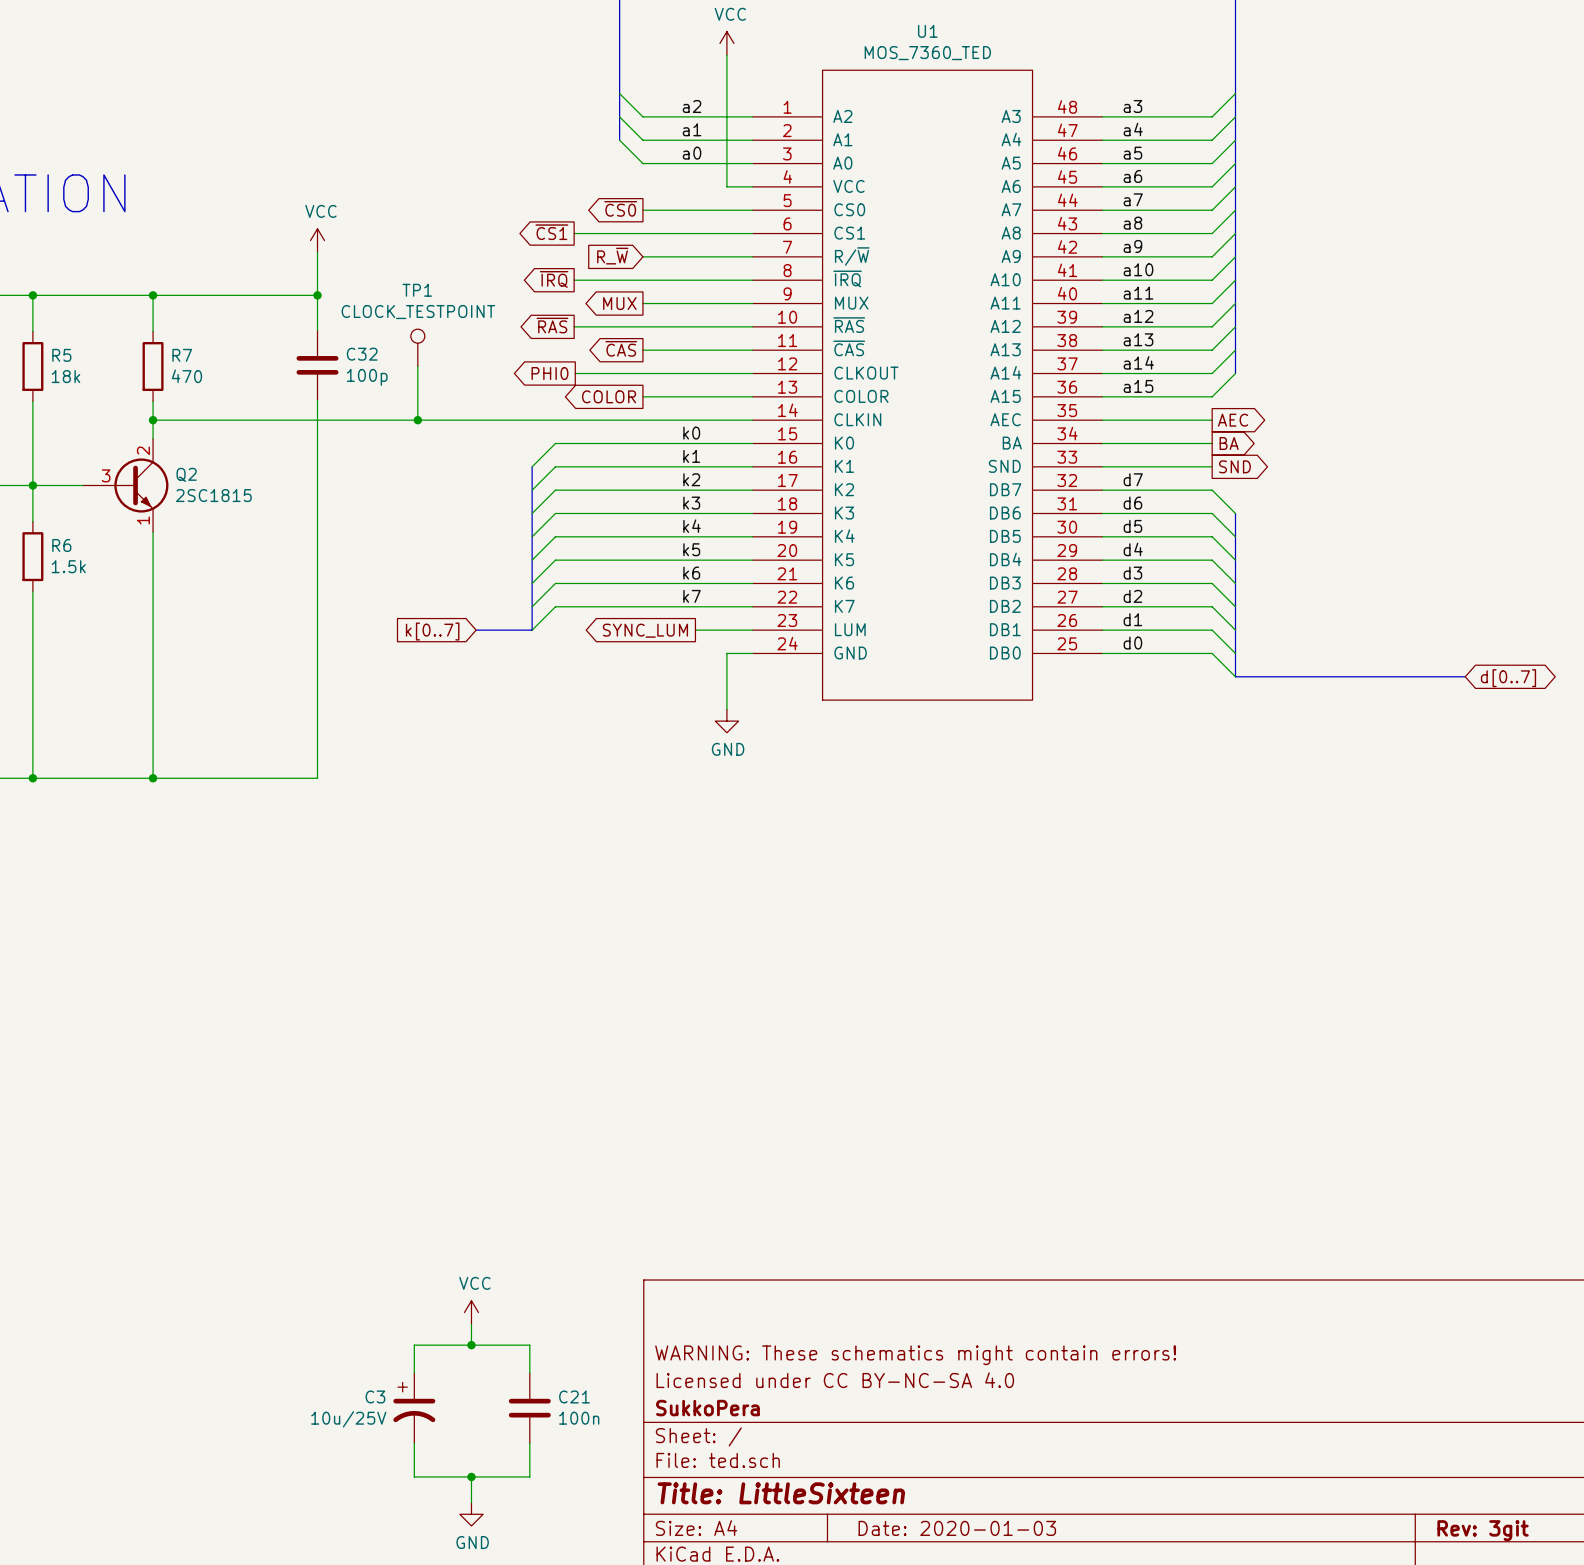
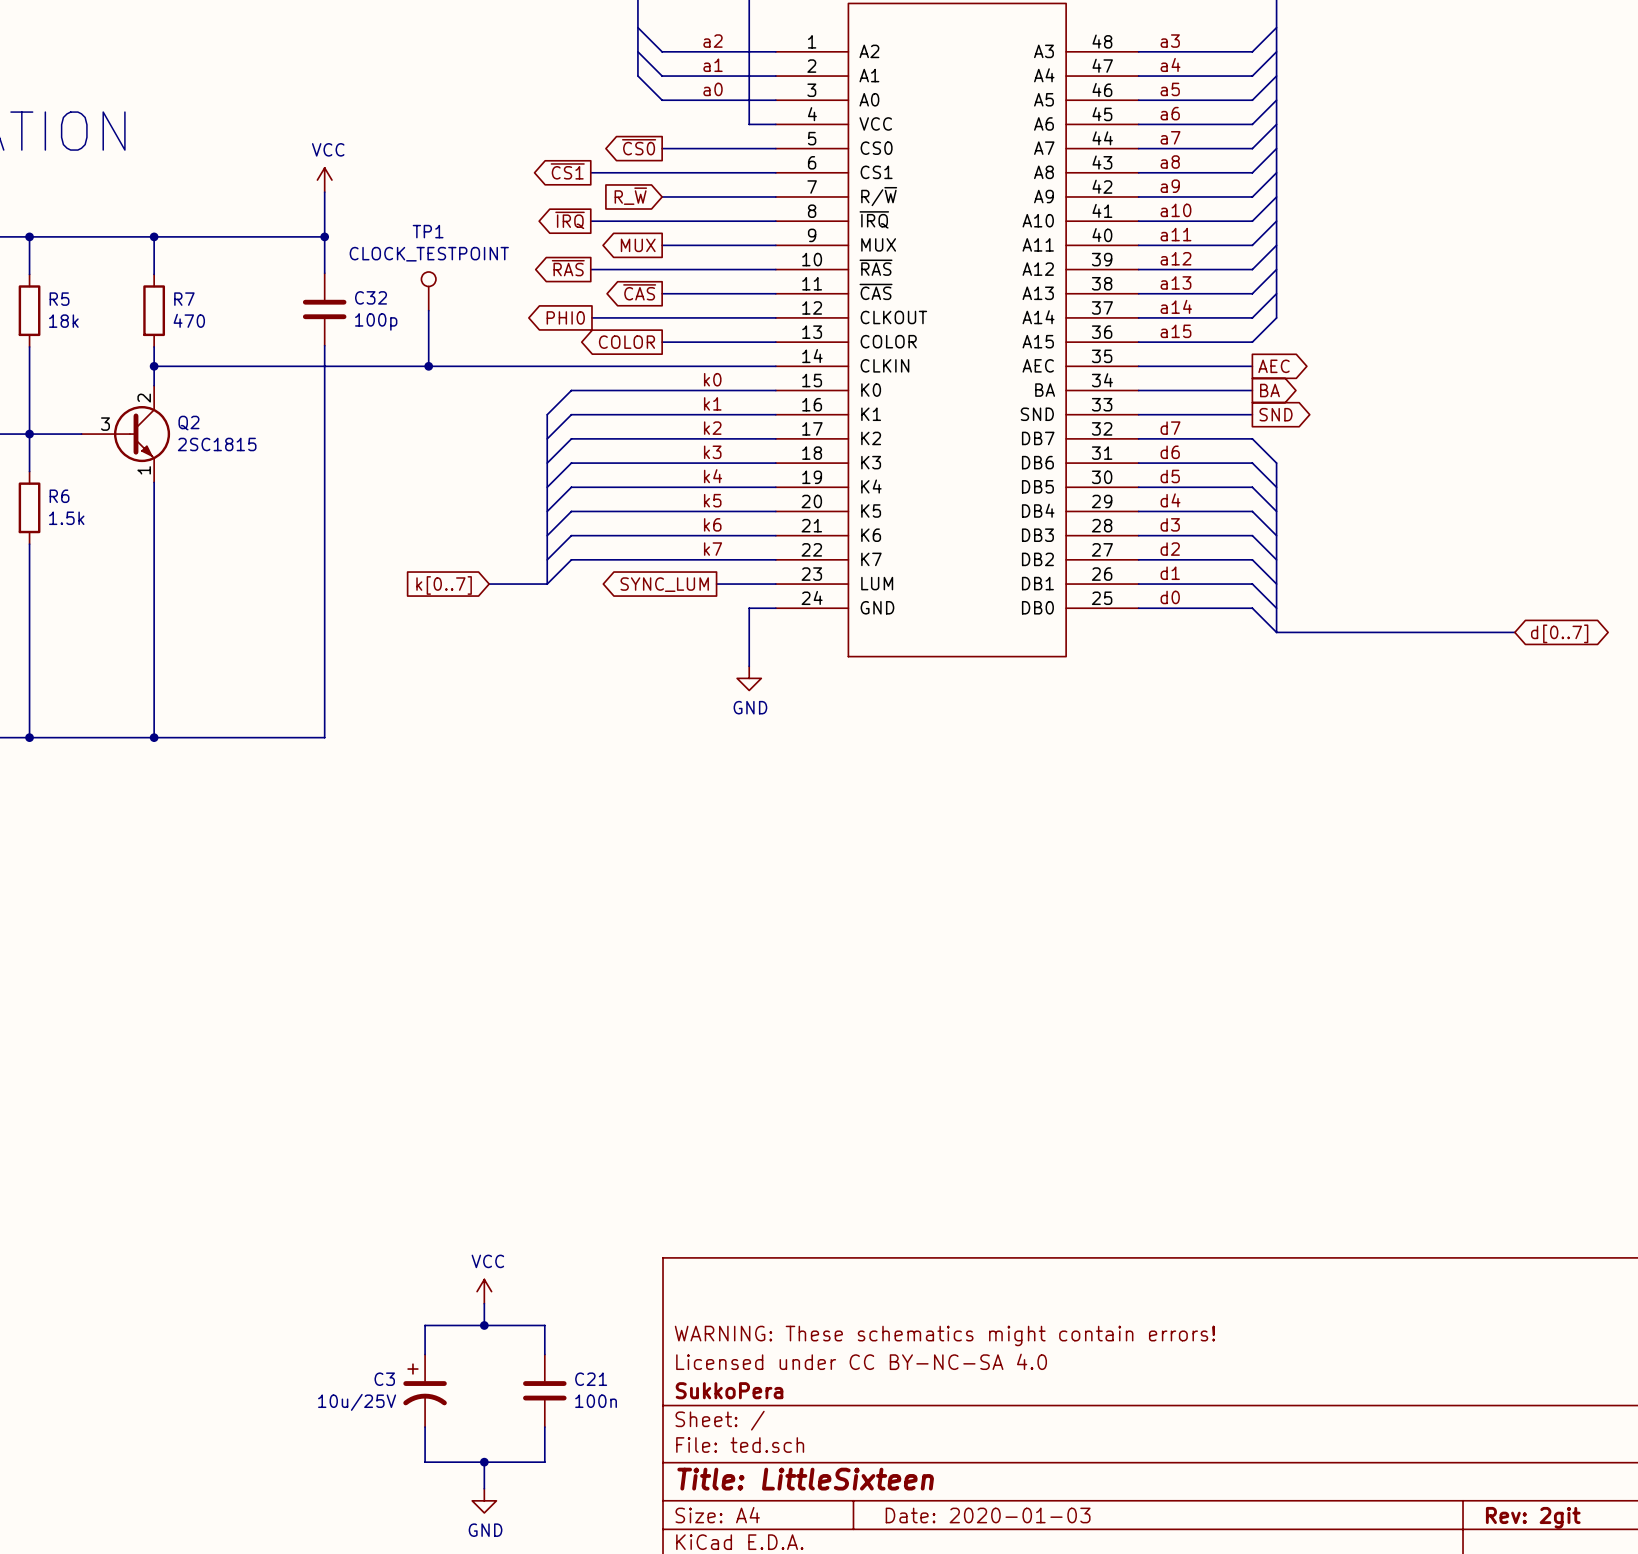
title block: Rev: 3git (1483, 1530) -> Rev: 2git (1533, 1517)

